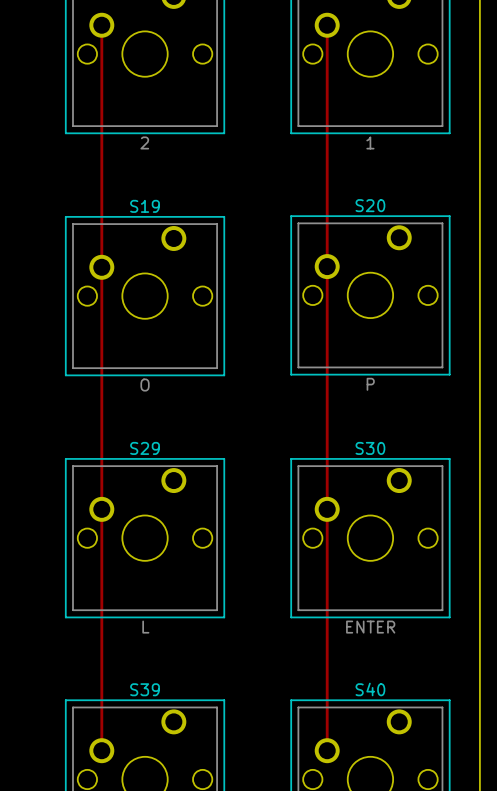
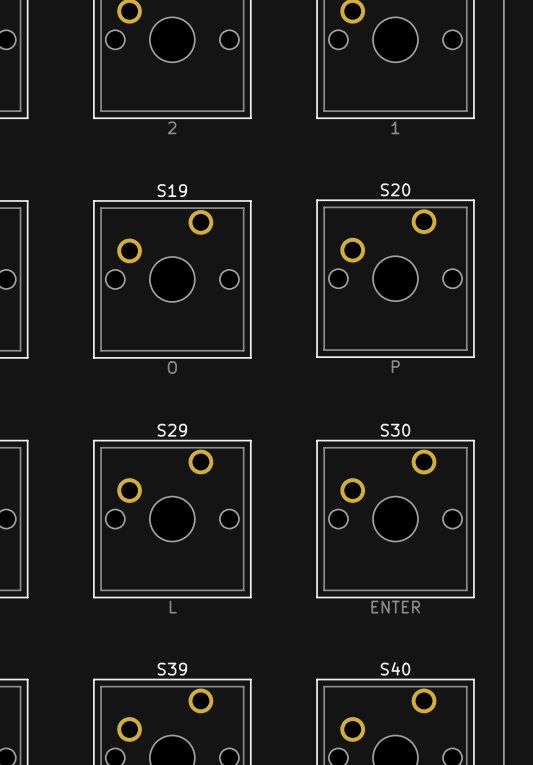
track: (101, 25) (101, 750) -> none
track: (327, 25) (327, 750) -> none

